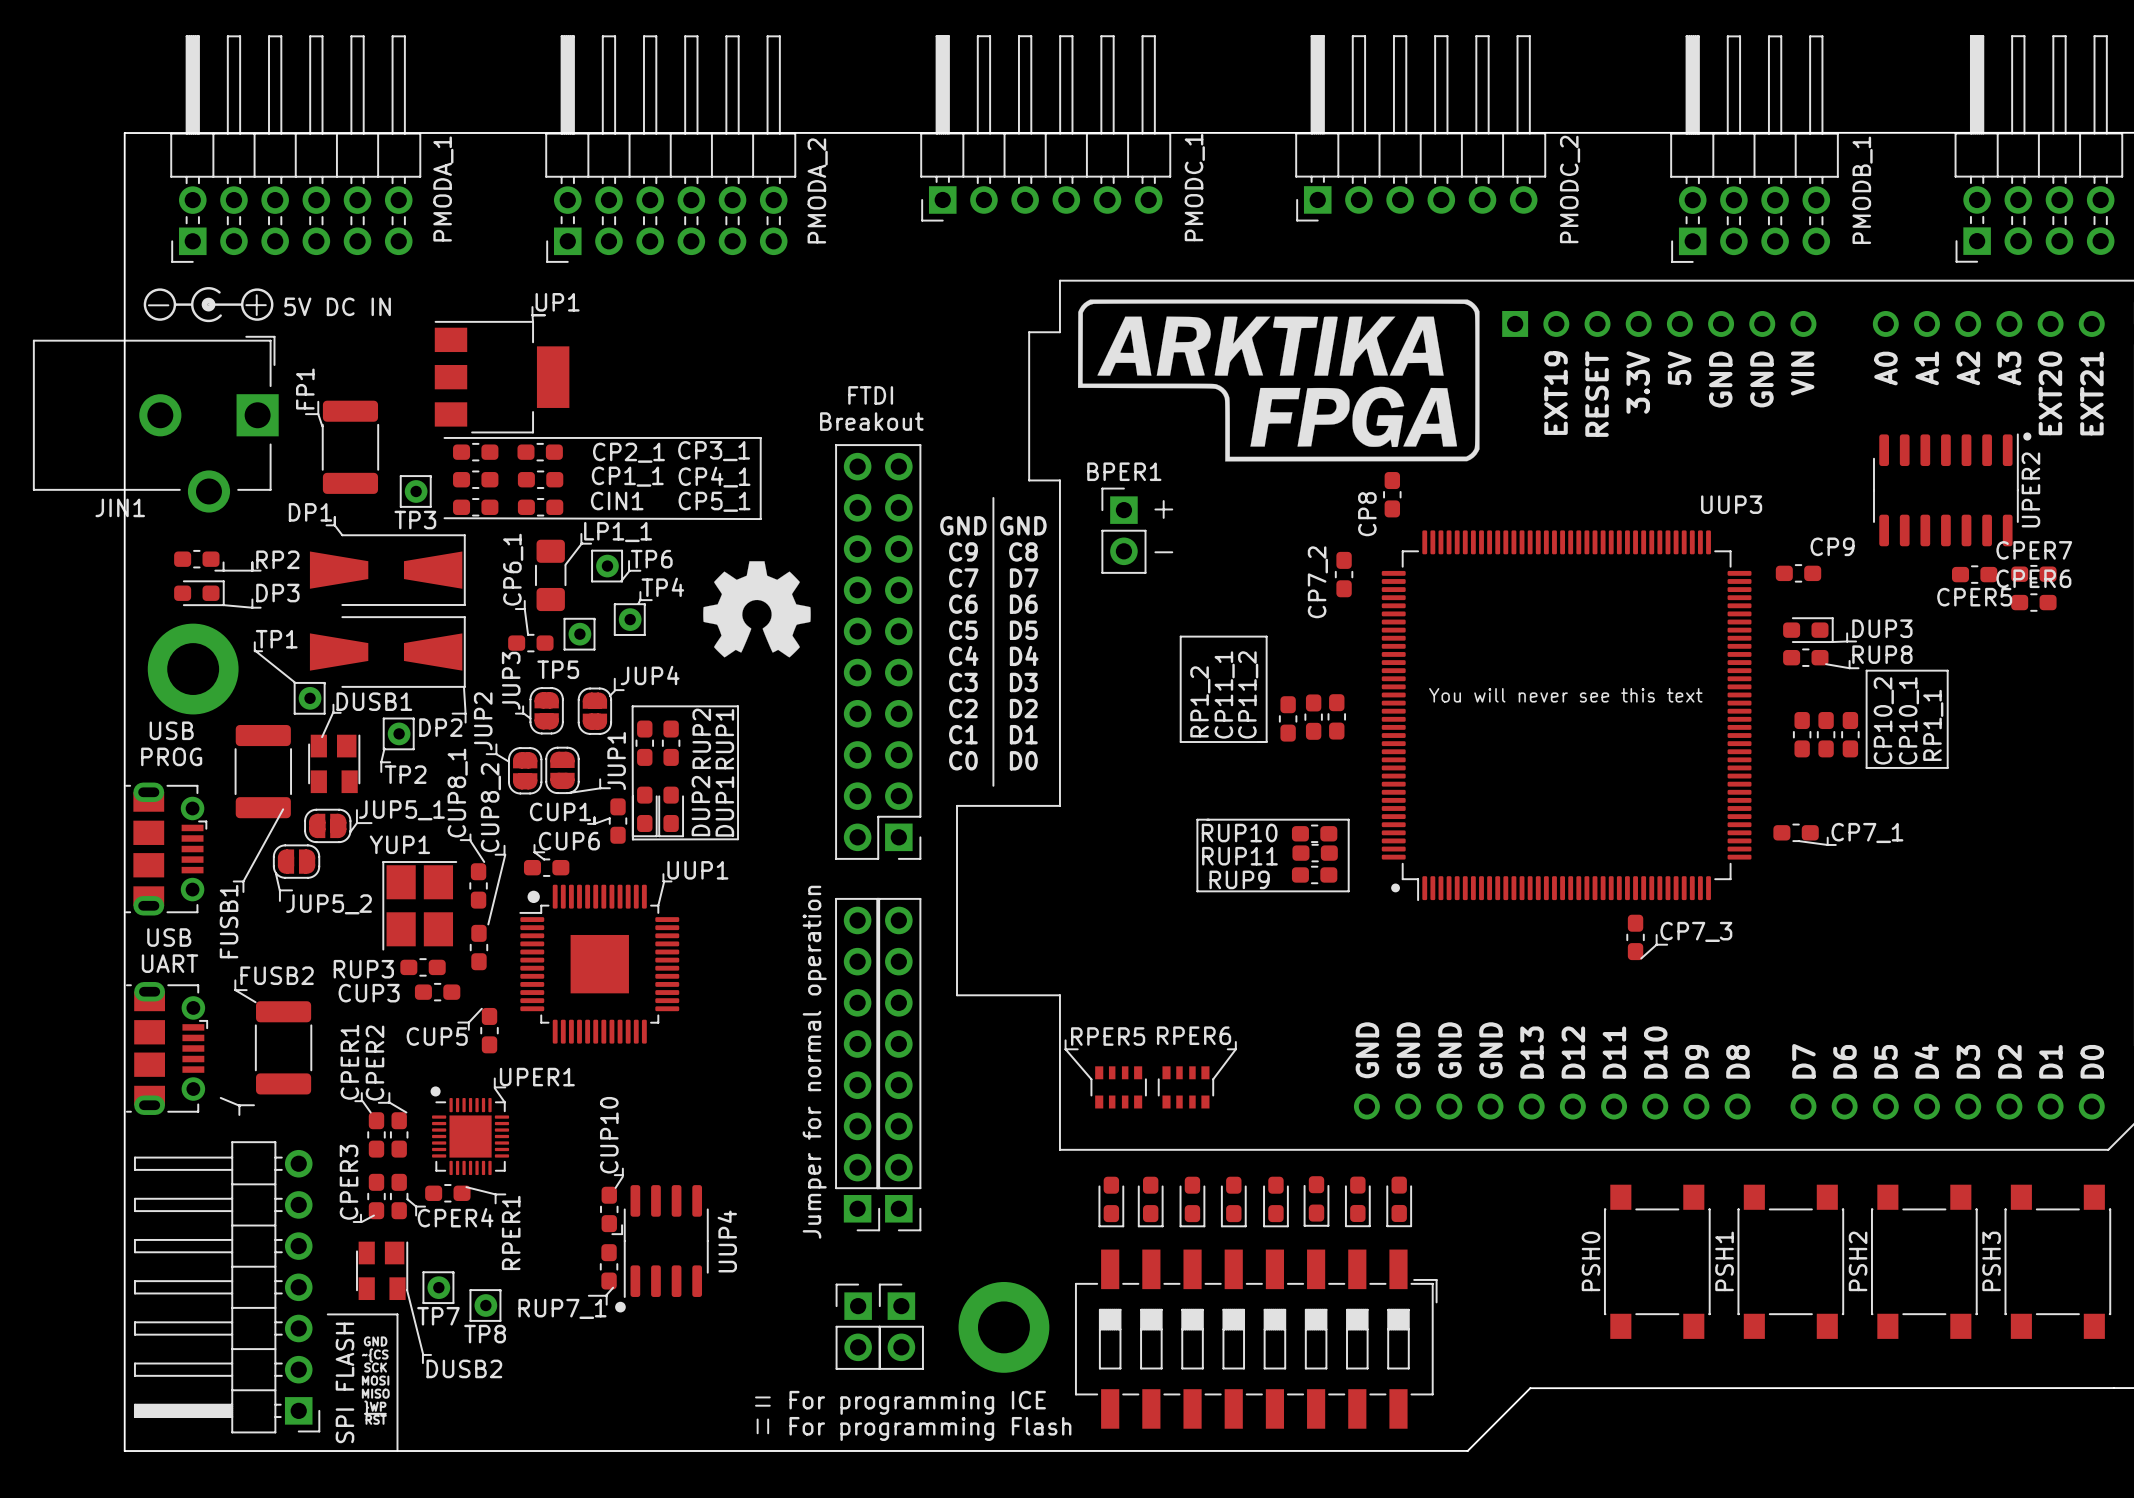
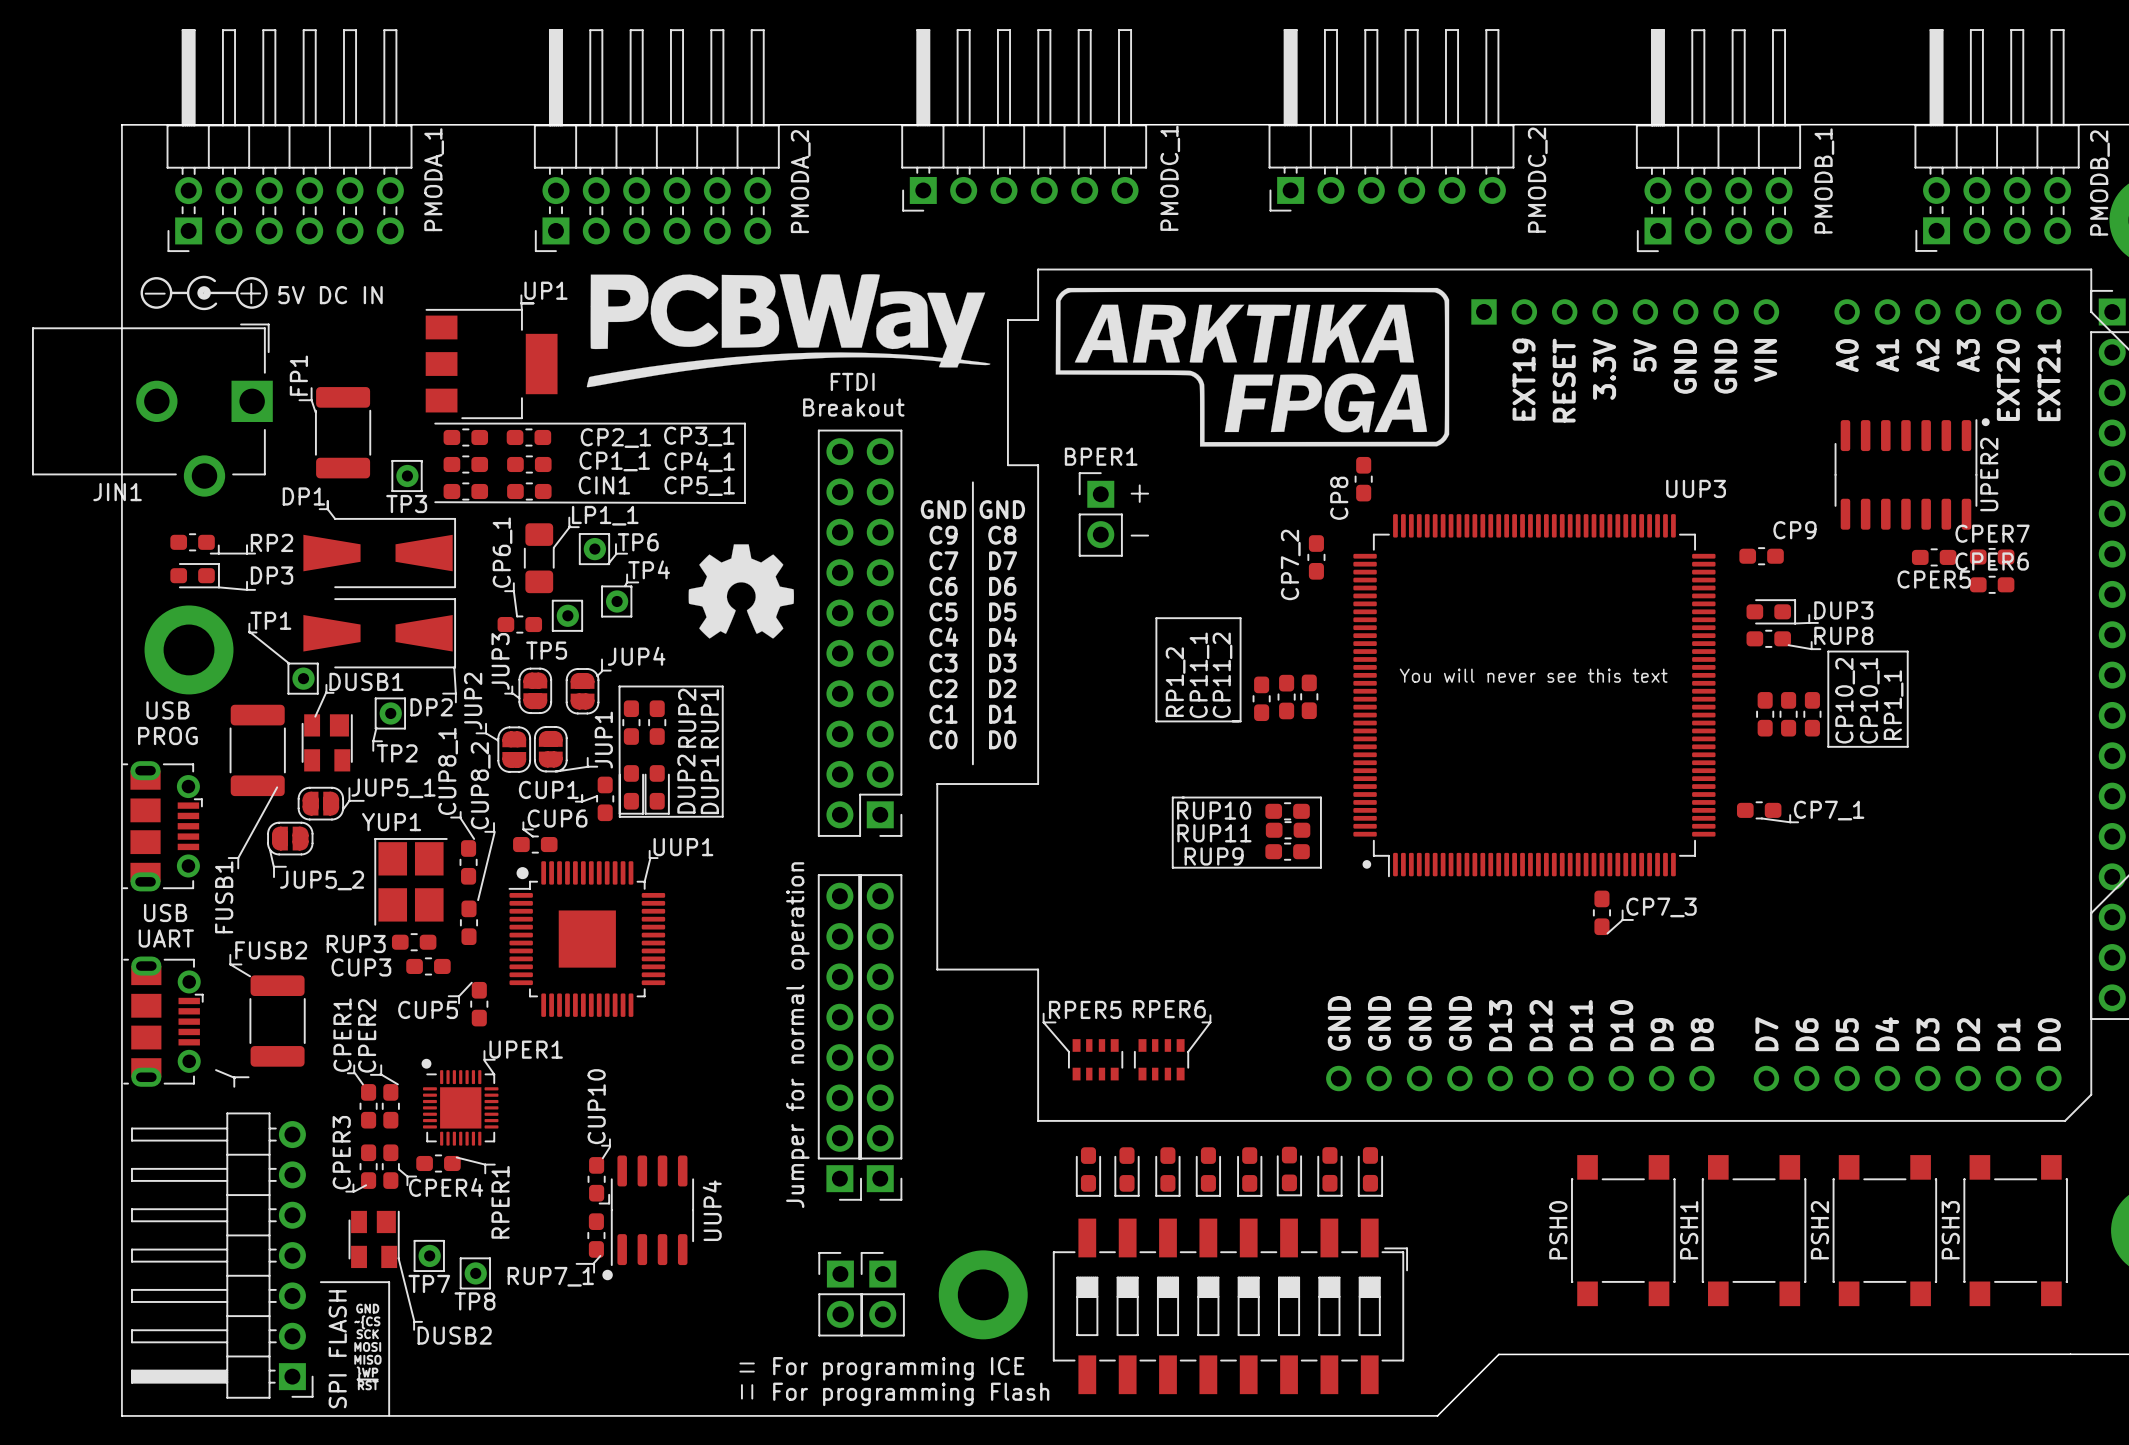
drawing: none -> [586, 274, 991, 388]

